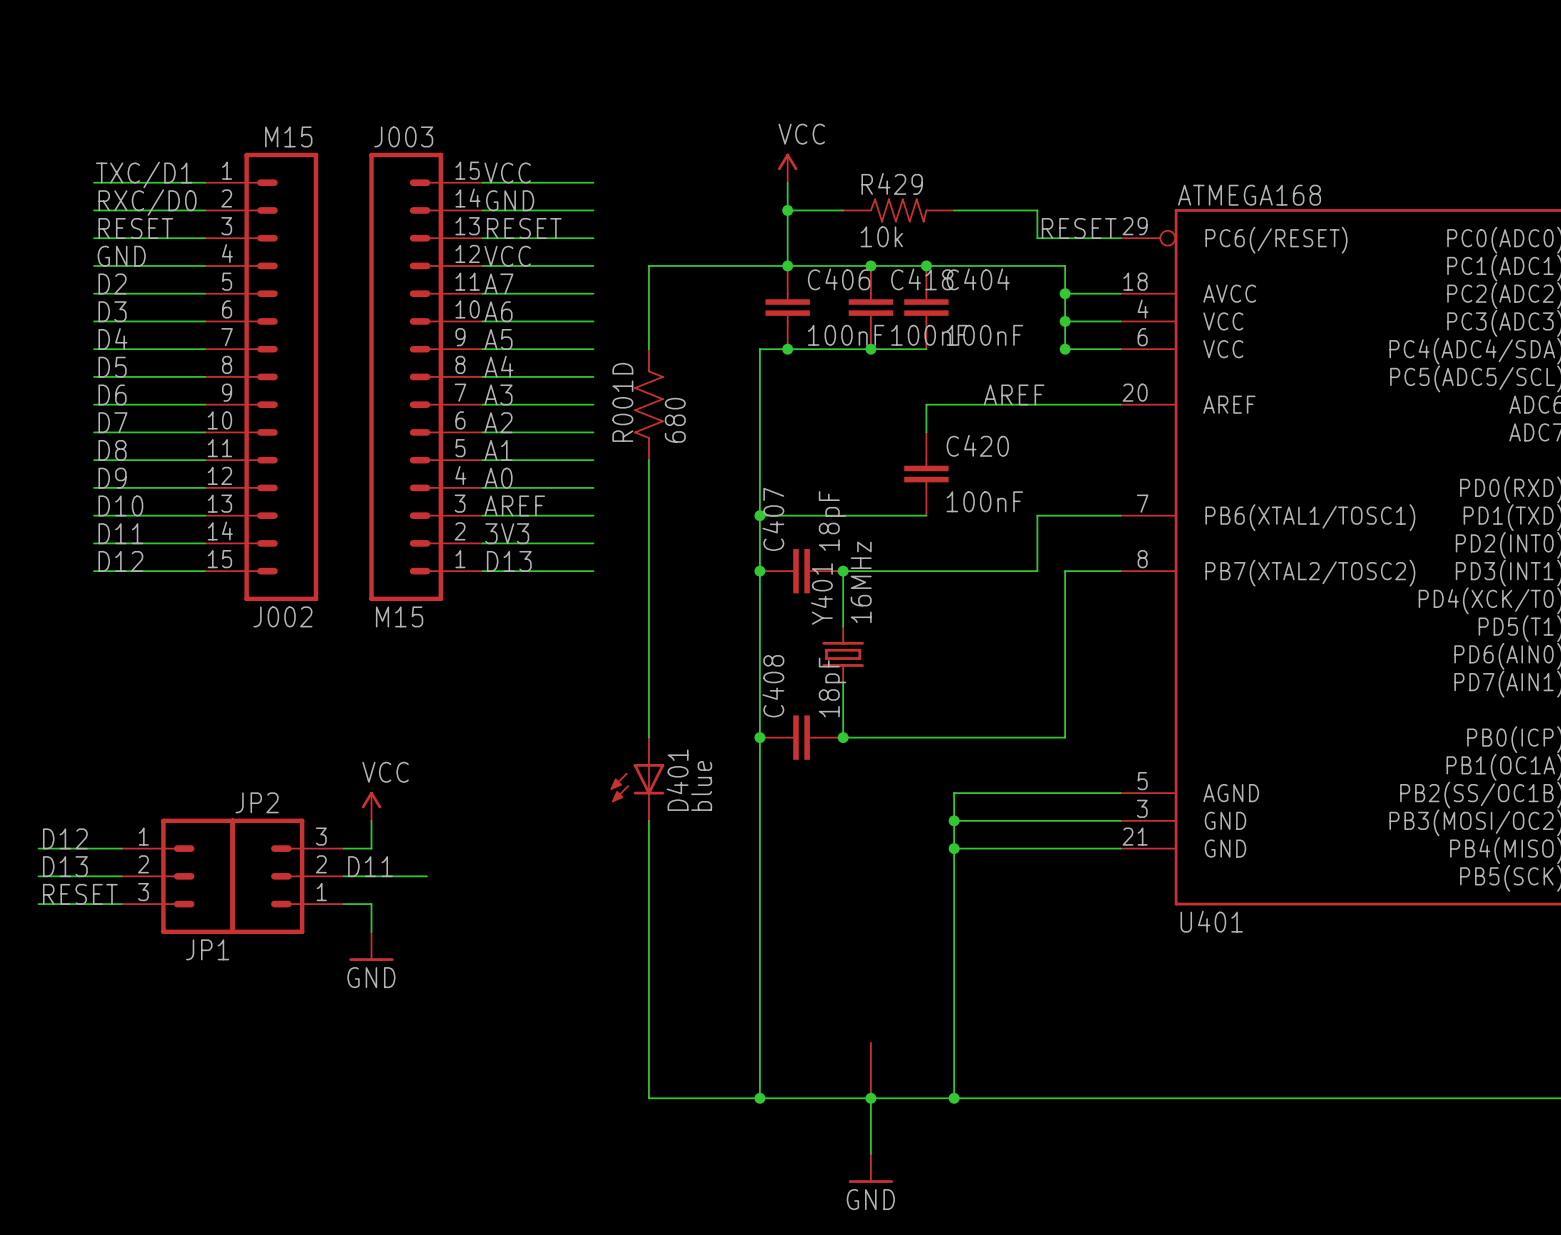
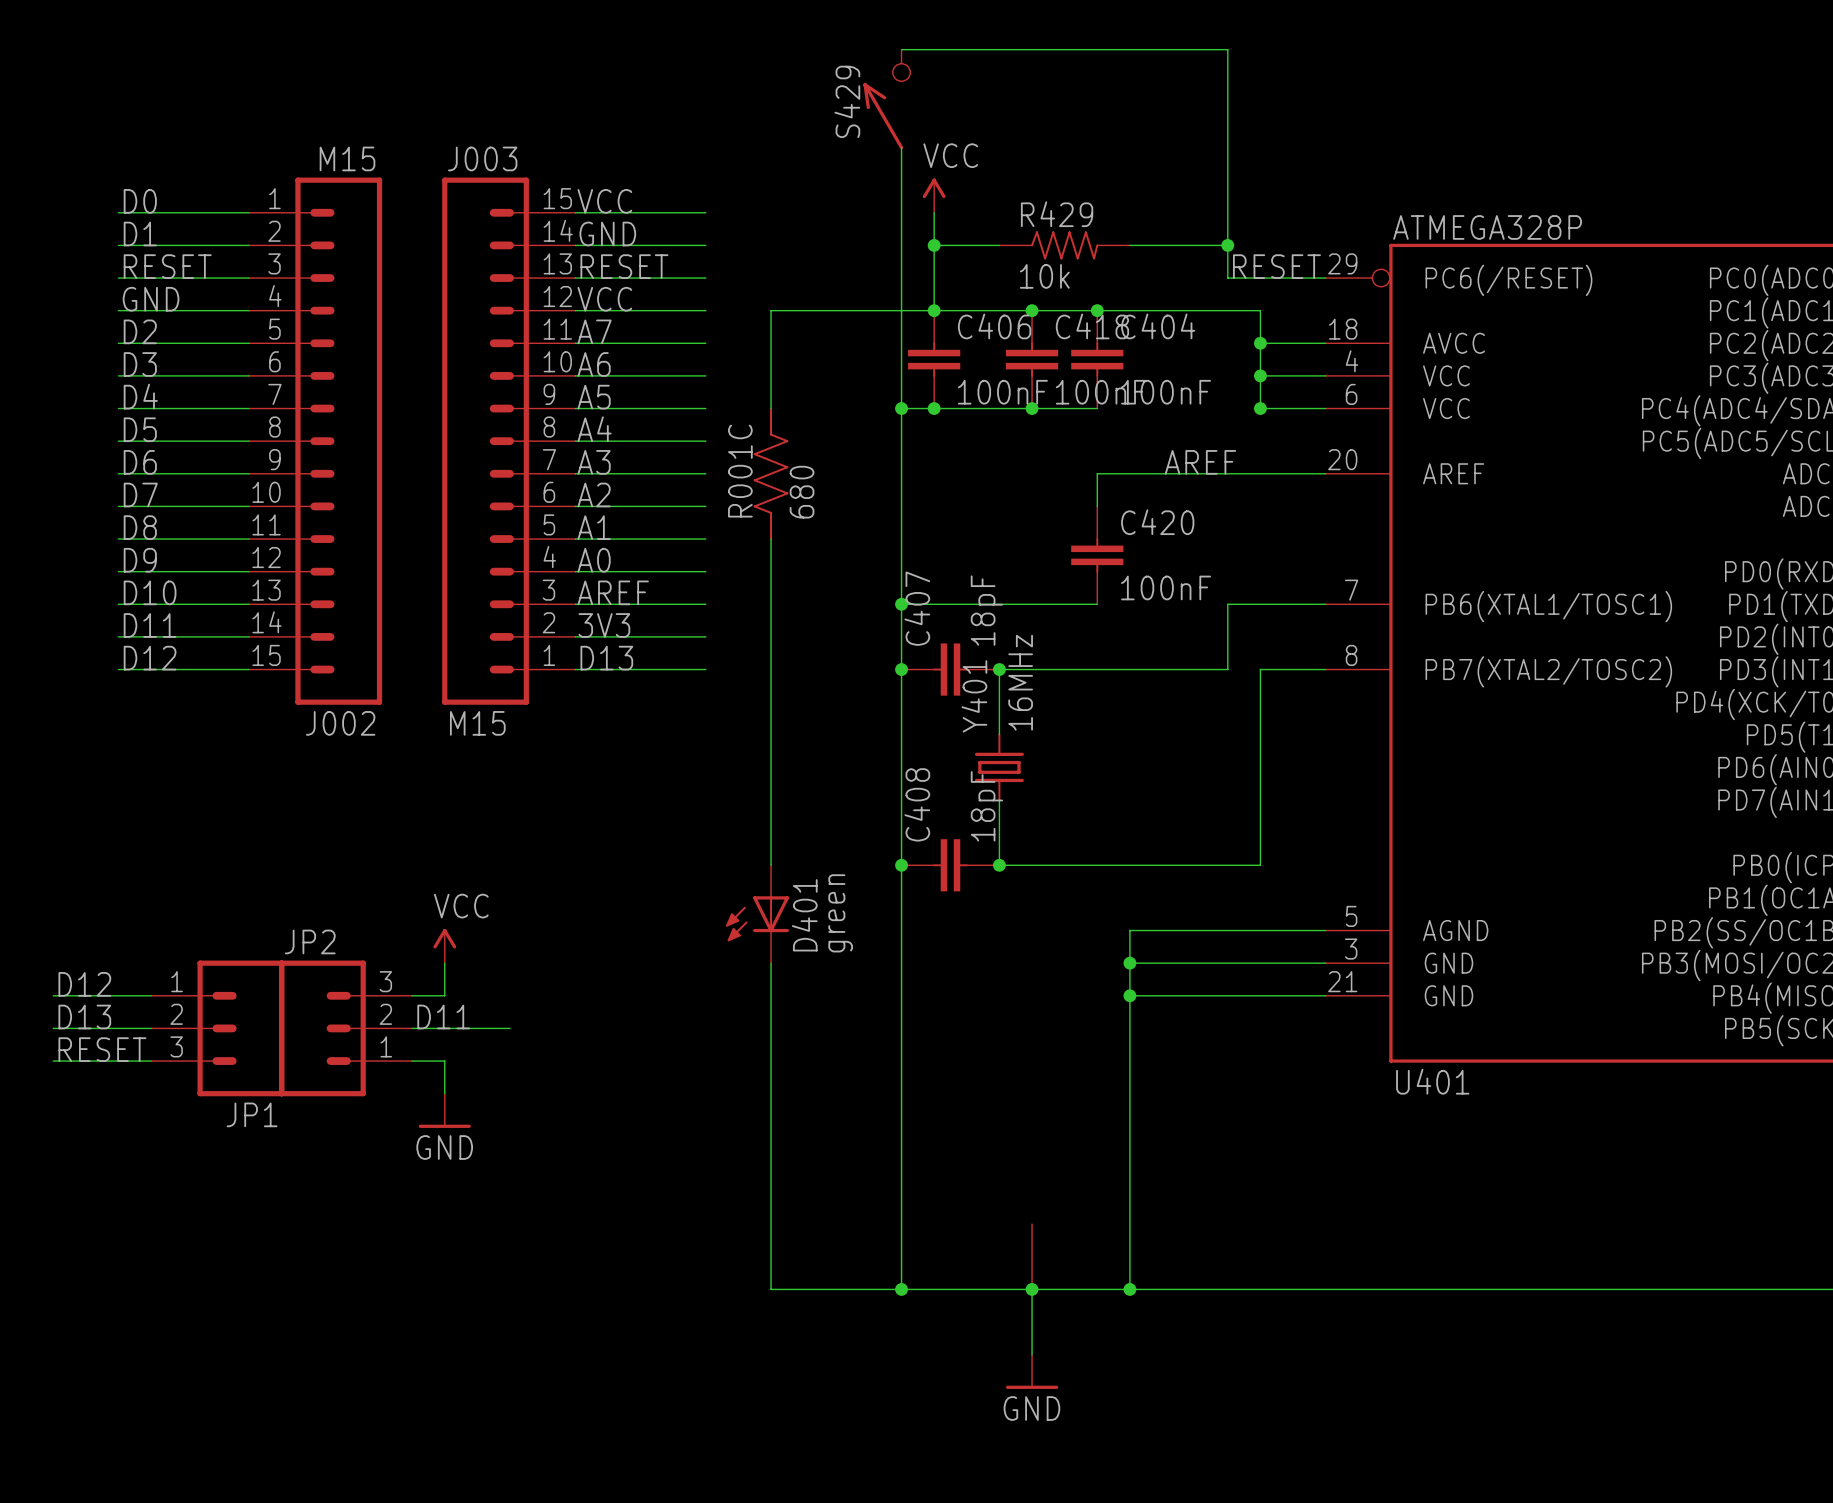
wire: none -> (901, 49) (1227, 49) (1227, 245)
S429: none -> (886, 99)
wire: none -> (901, 147) (901, 408)
label: TXC/D1 (144, 174) -> D0 (140, 201)
U401 value: ATMEGA168 (1249, 195) -> ATMEGA328P (1487, 227)
label: RXC/D0 (147, 202) -> D1 (140, 233)
junction: none -> (1227, 245)
junction: none -> (901, 408)
R001D name: R001D (622, 402) -> R001C (740, 471)
D401 value: blue (701, 785) -> green (840, 913)

